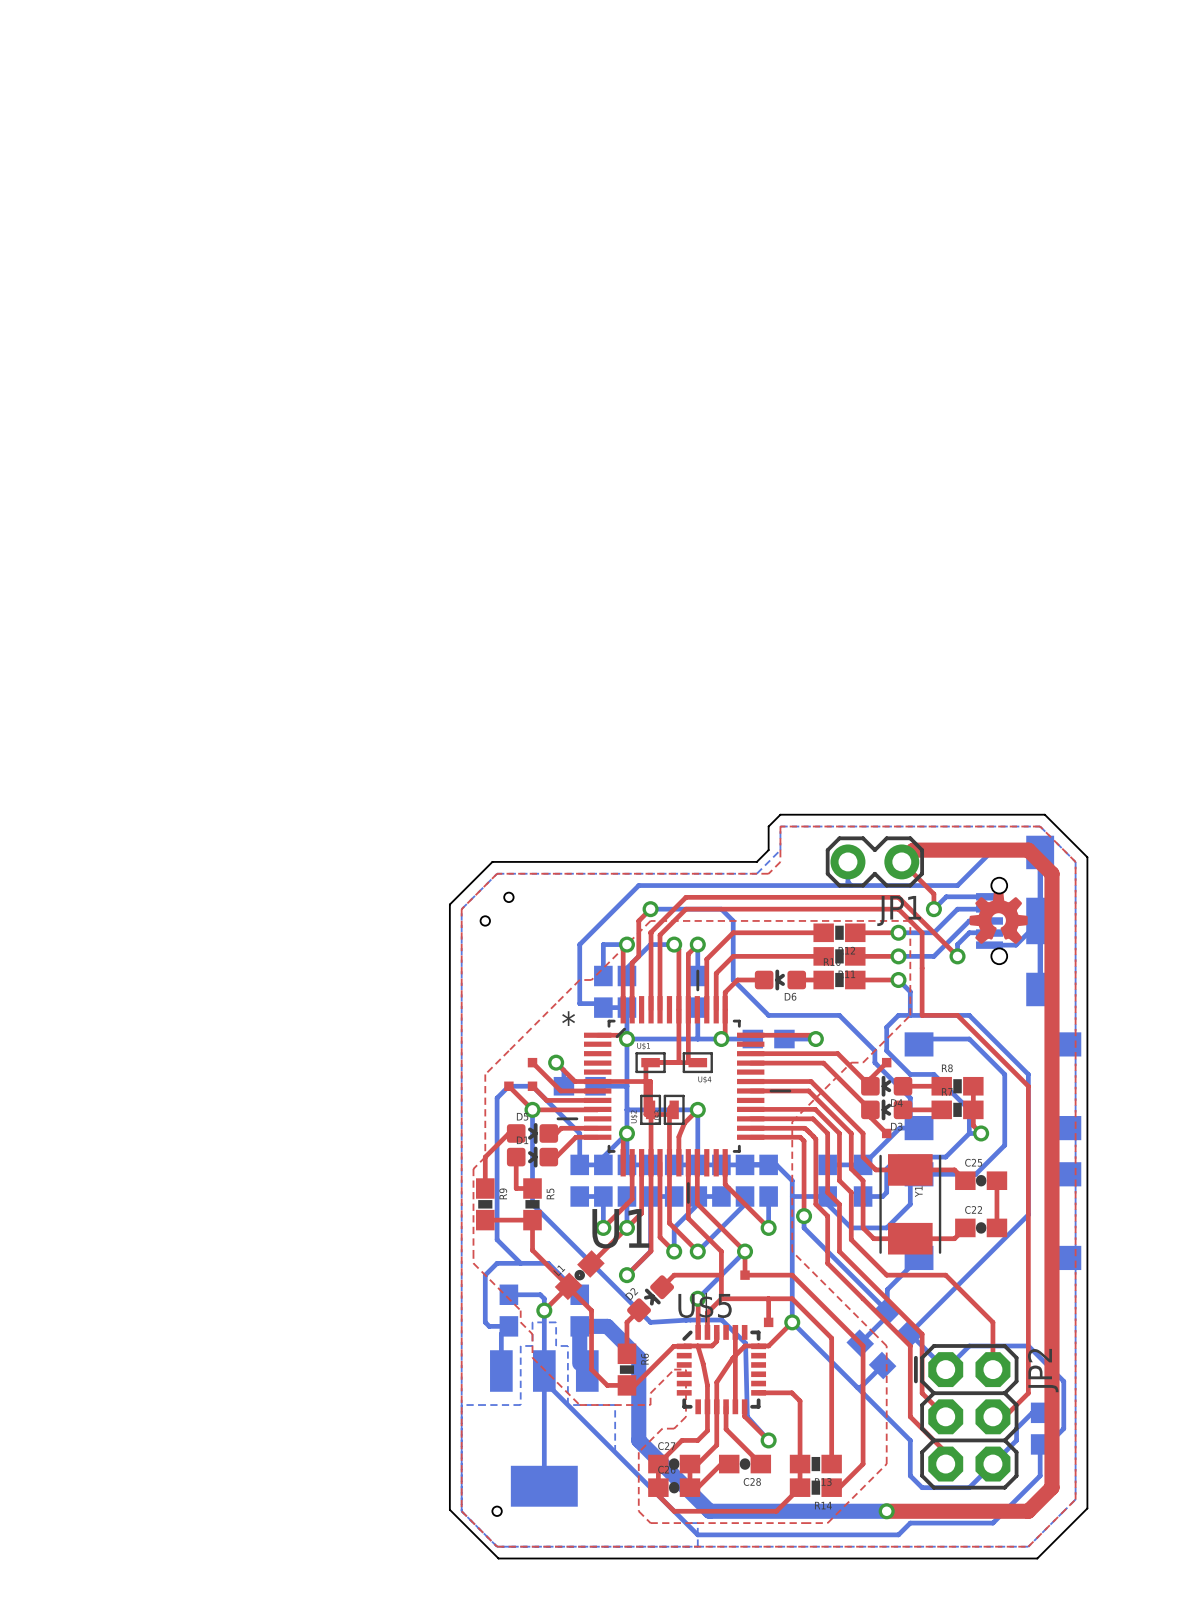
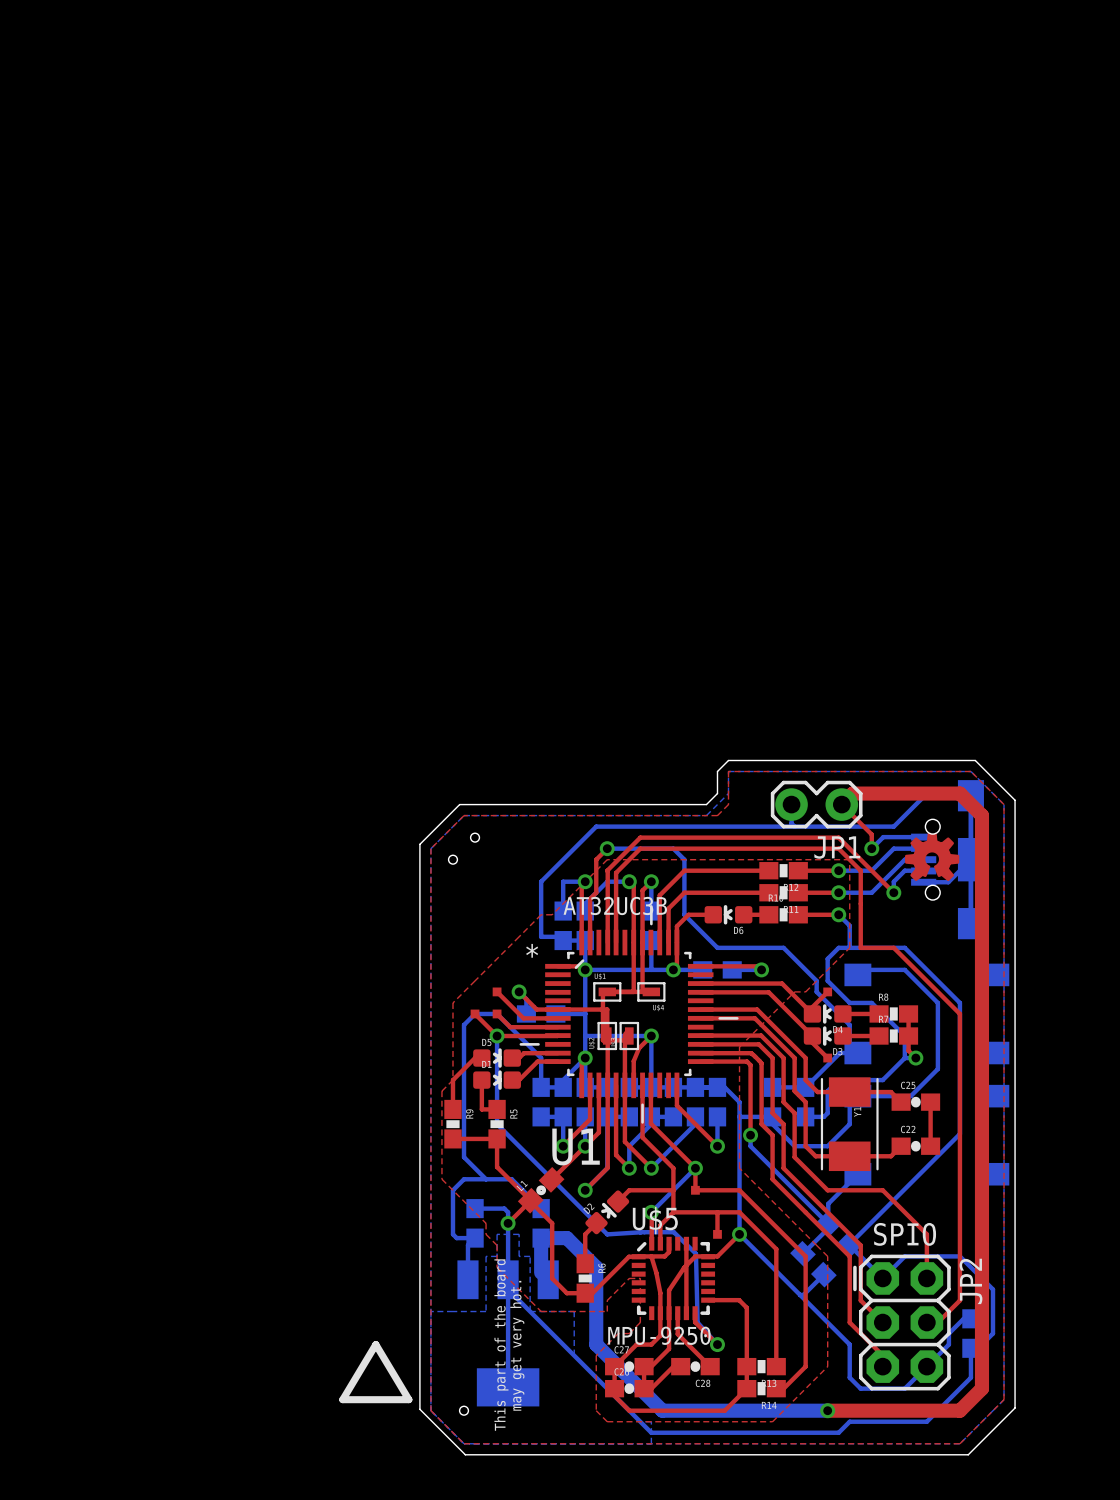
text: none -> AT32UC3B (615, 905)
text: none -> SPIO (904, 1234)
text: none -> MPU-9250 (659, 1335)
line: none -> (375, 1344) (342, 1399) (408, 1399) (375, 1344)
text: none -> may get very hot. (517, 1345)
text: none -> This part of the board (501, 1345)

